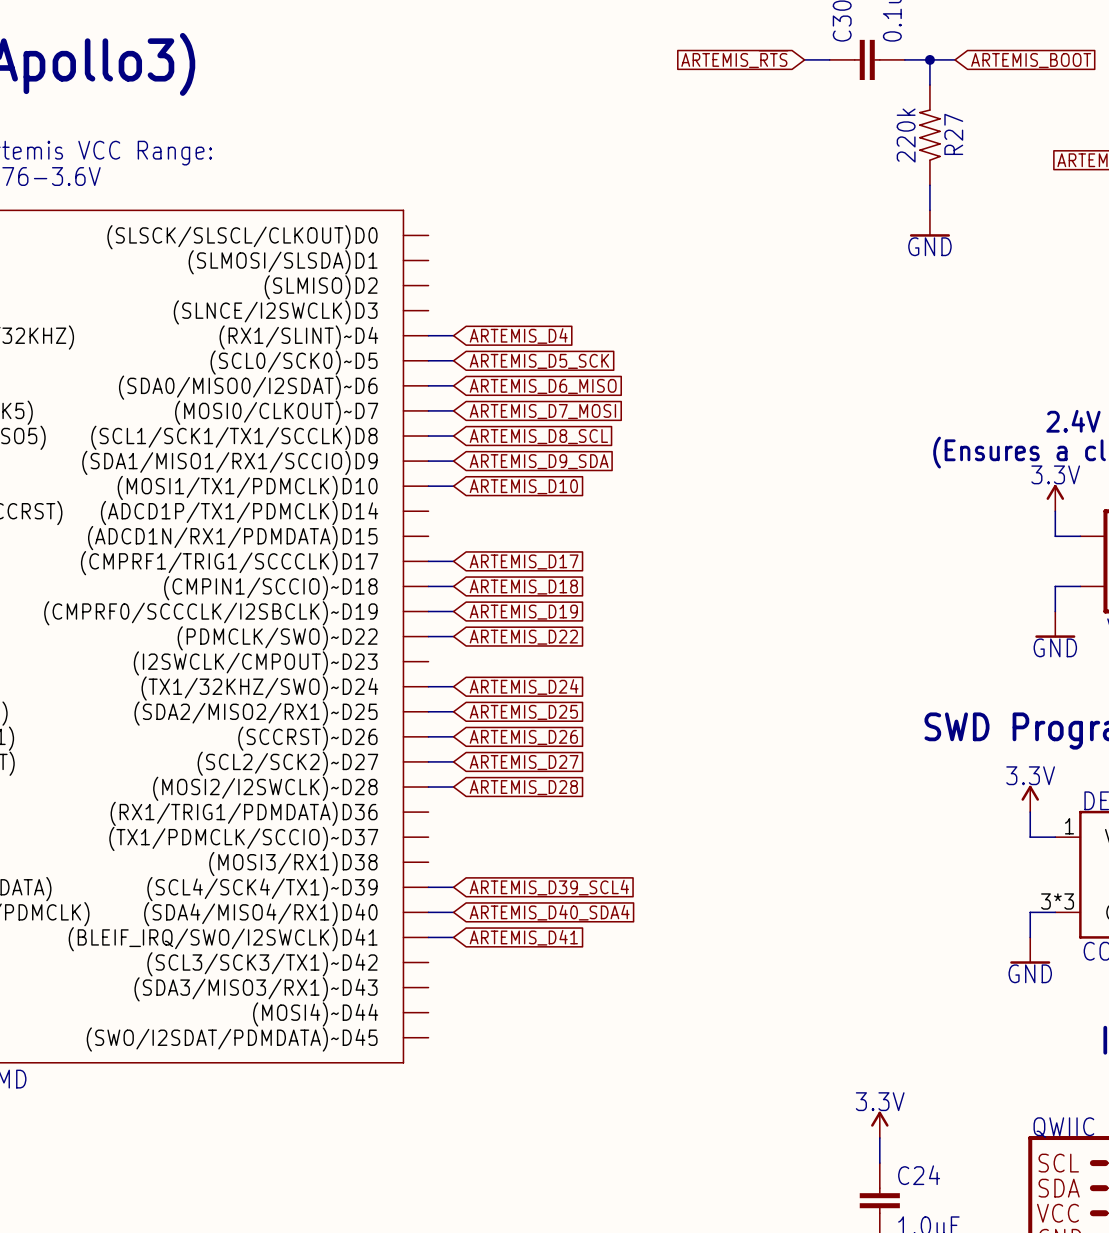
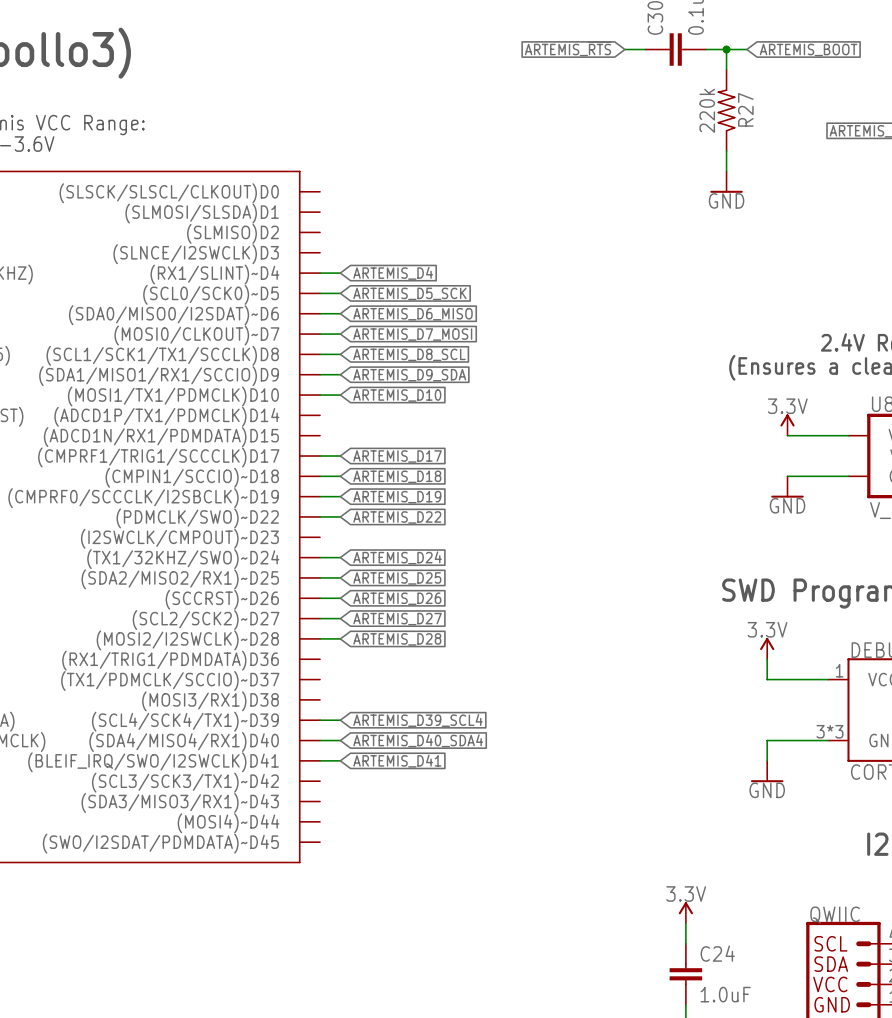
power symbol position: 3.3V (1055, 498) -> 3.3V (787, 425)
wire: (1055, 511) (1055, 536) -> (787, 435) (828, 435)
wire: (1055, 586) (1055, 611) -> (828, 476) (787, 476)
power symbol position: GND (1055, 624) -> GND (787, 487)
power symbol position: 3.3V (1030, 798) -> 3.3V (767, 648)
wire: (1030, 812) (1030, 837) -> (767, 659) (767, 679) (807, 679)
wire: (1030, 912) (1030, 937) -> (807, 740) (767, 740) (767, 760)
power symbol position: GND (1030, 950) -> GND (767, 771)

